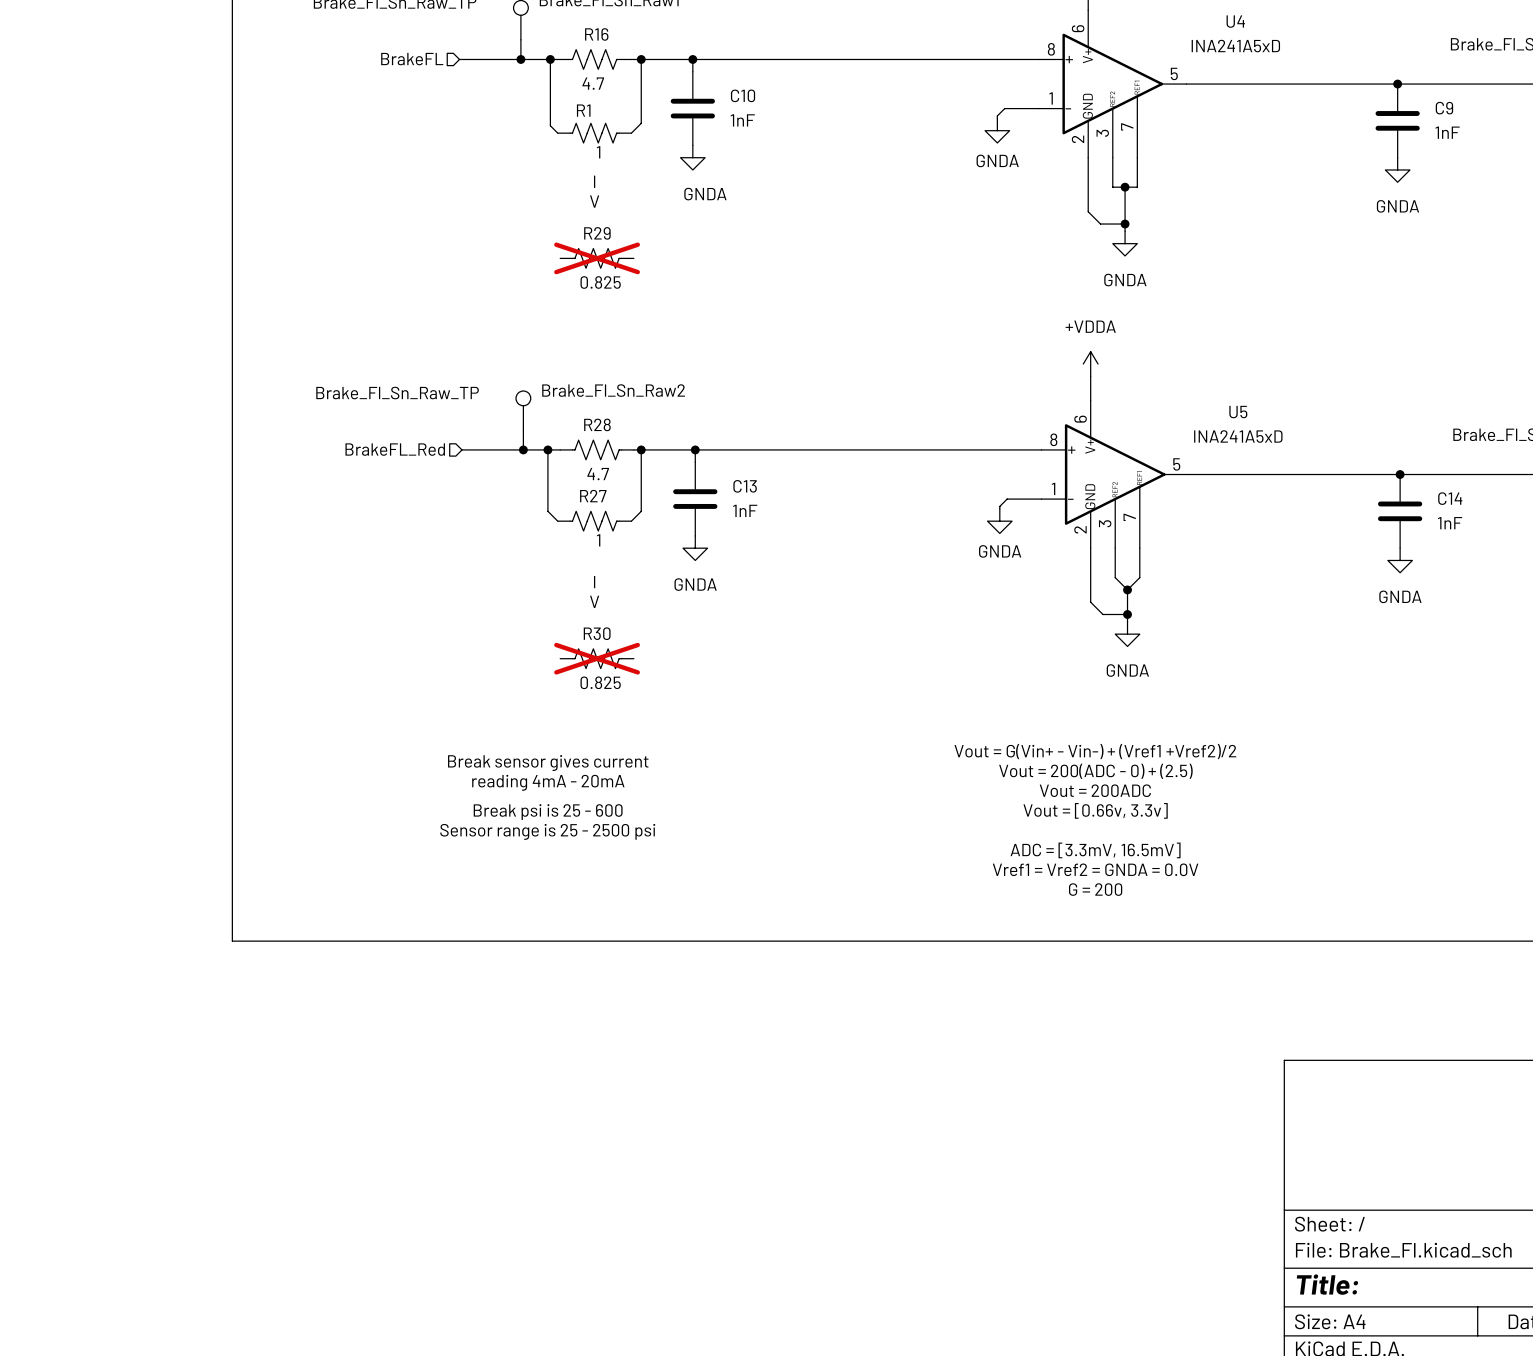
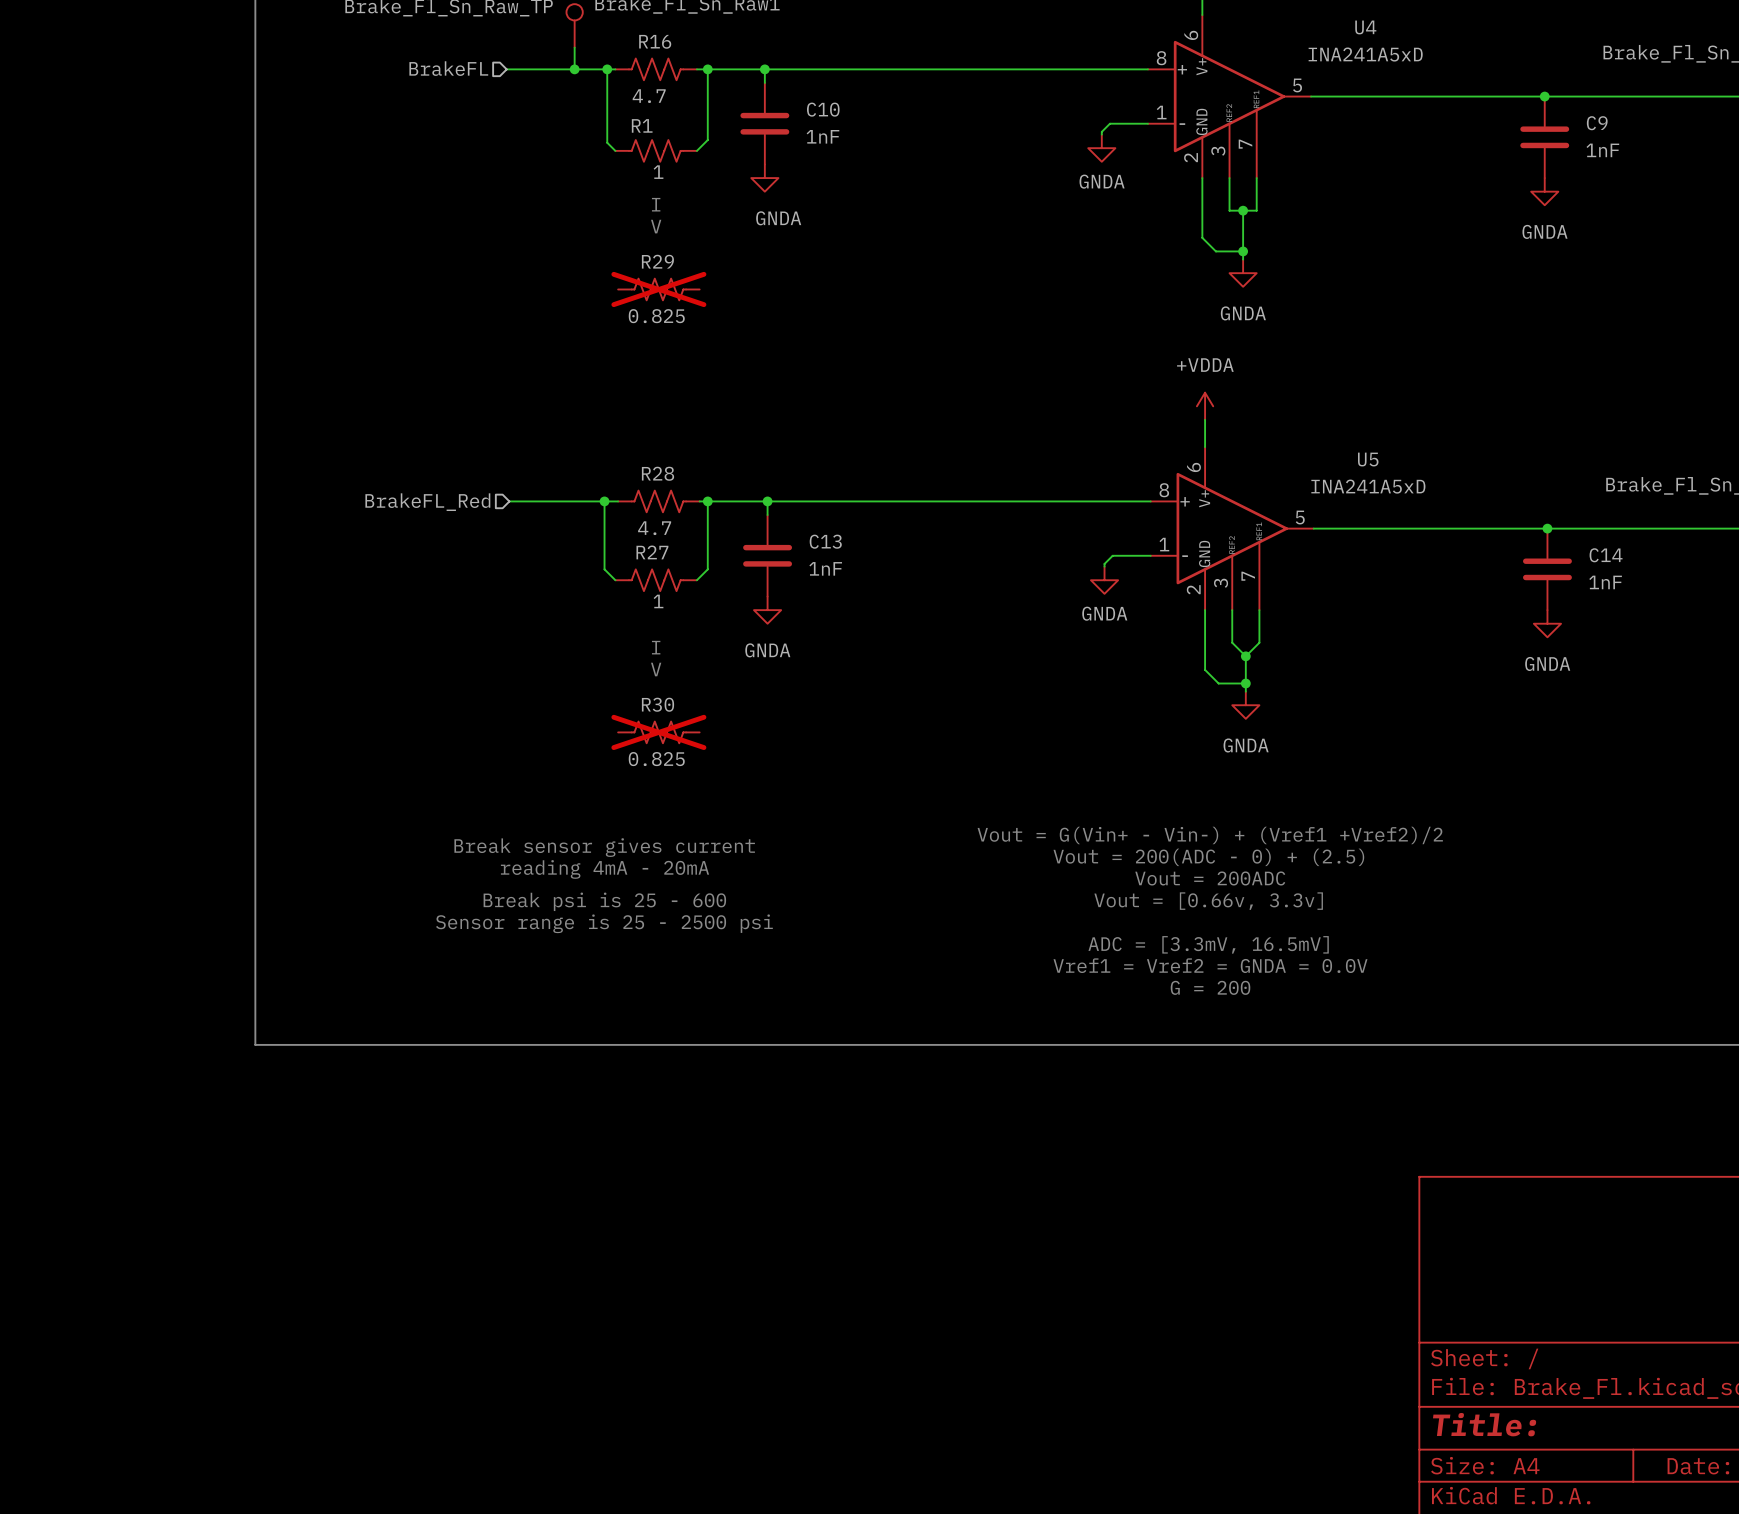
Brake_Fl_Sn_Raw2: Brake_Fl_Sn_Raw_TP (523, 410) -> none
wire: (523, 430) (523, 449) -> none
junction: (523, 449) -> none

